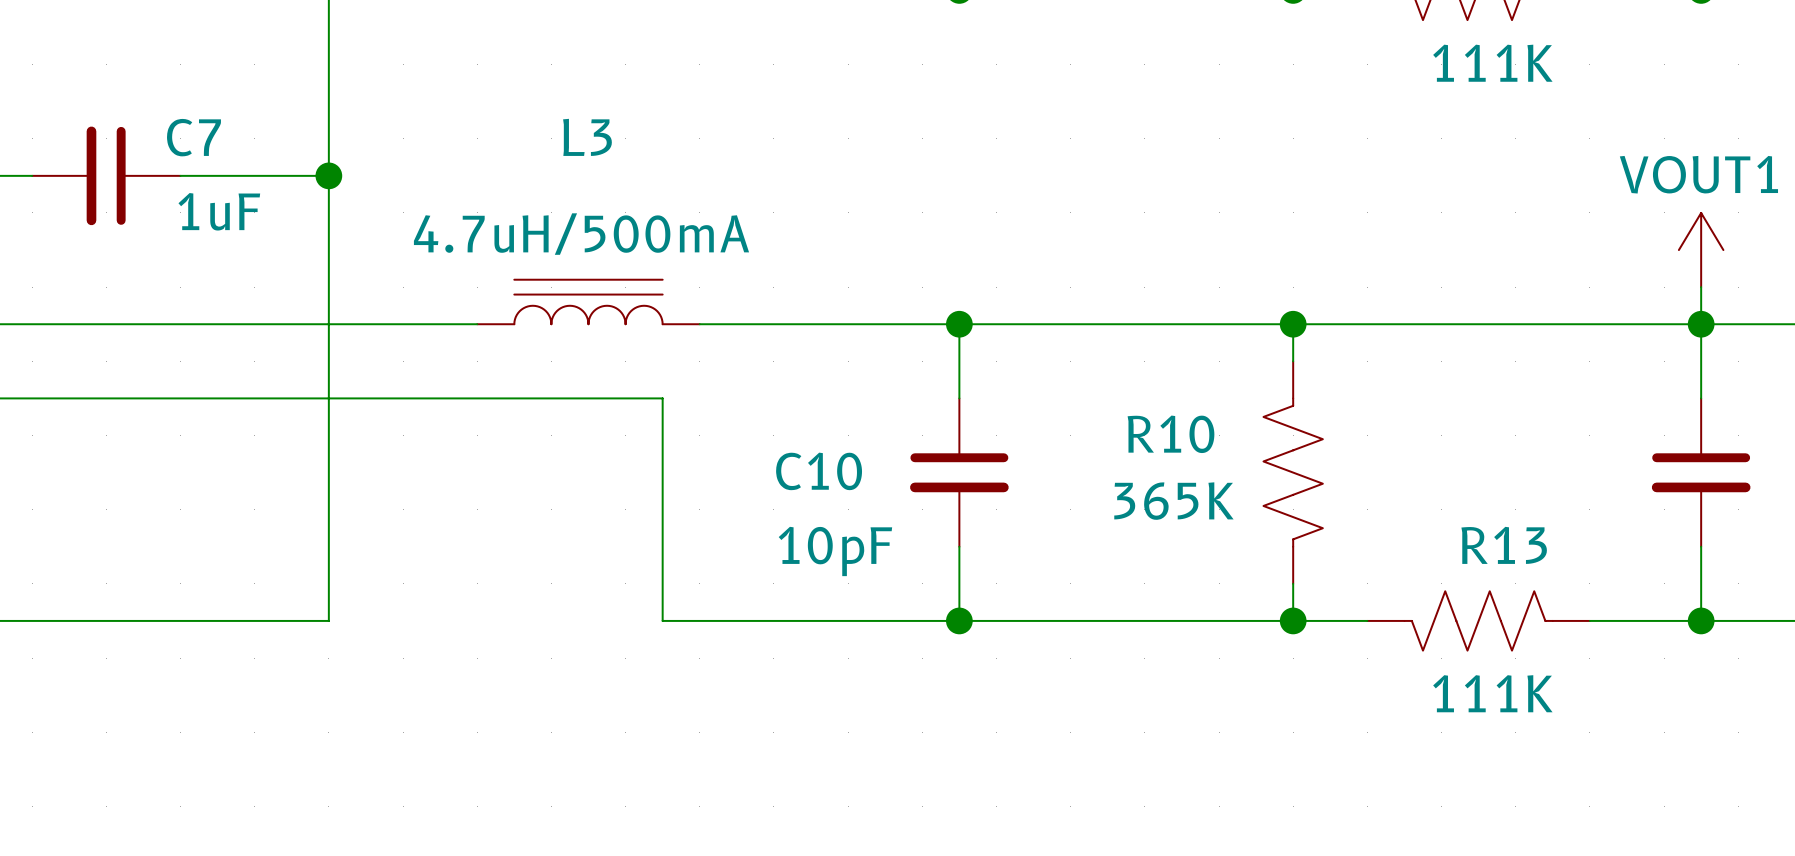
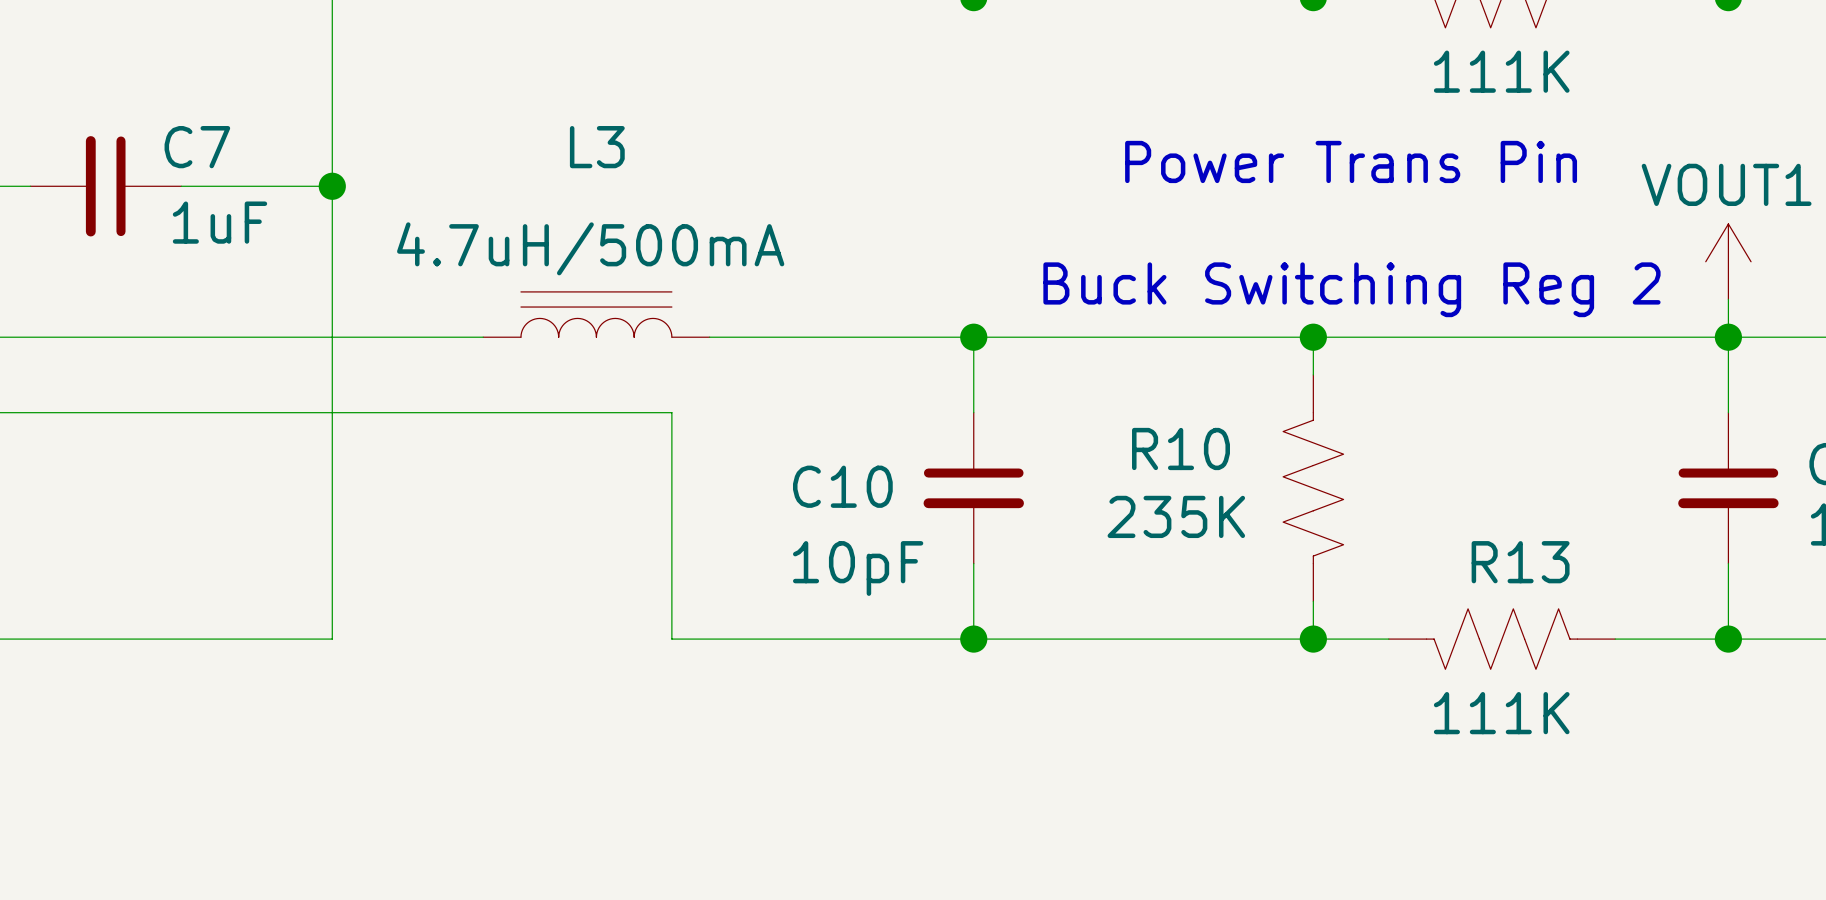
text: none -> Power Trans Pin (1351, 161)
text: none -> Buck Switching Reg 2 (1351, 289)
R10 value: 365K (1173, 501) -> 235K (1176, 516)

